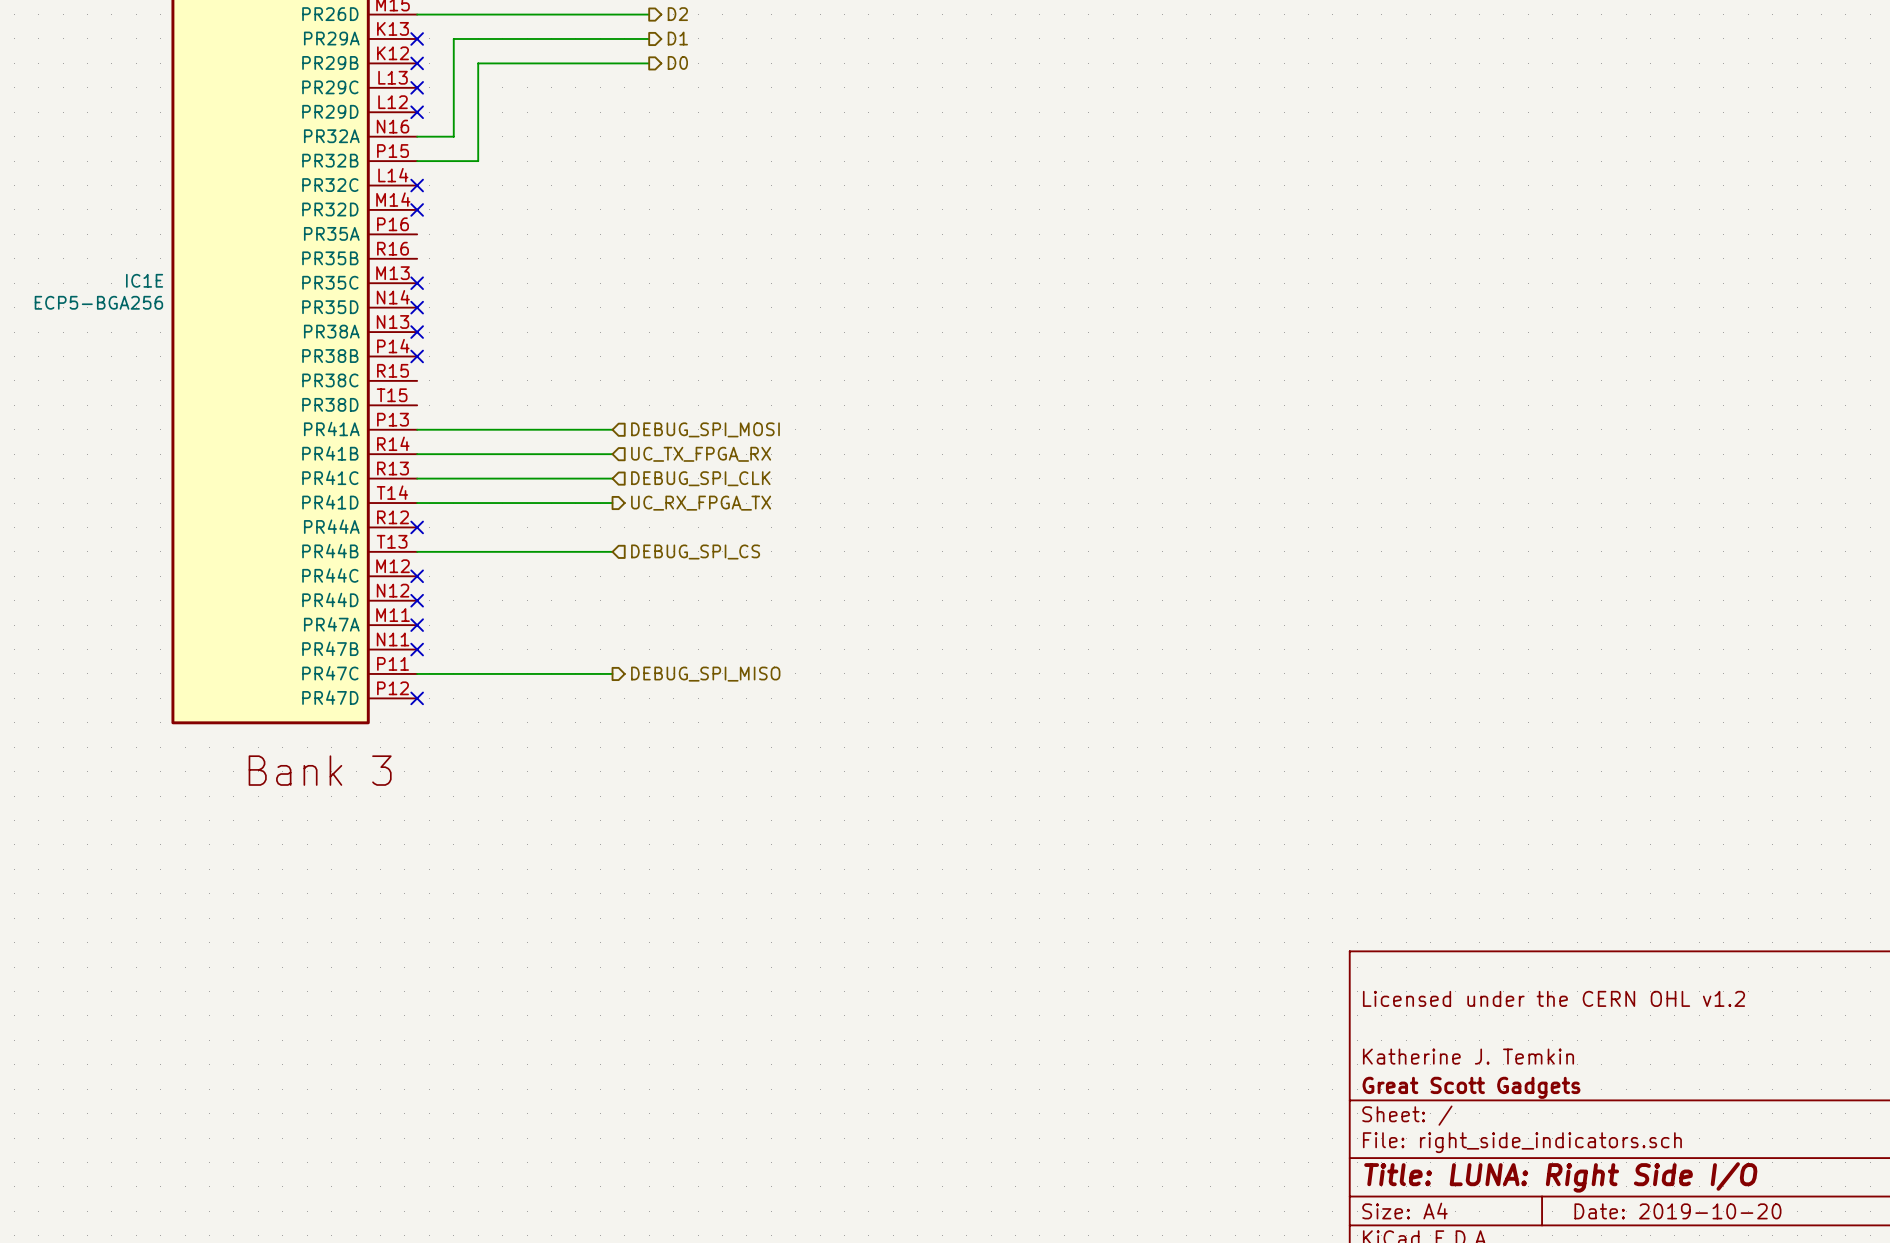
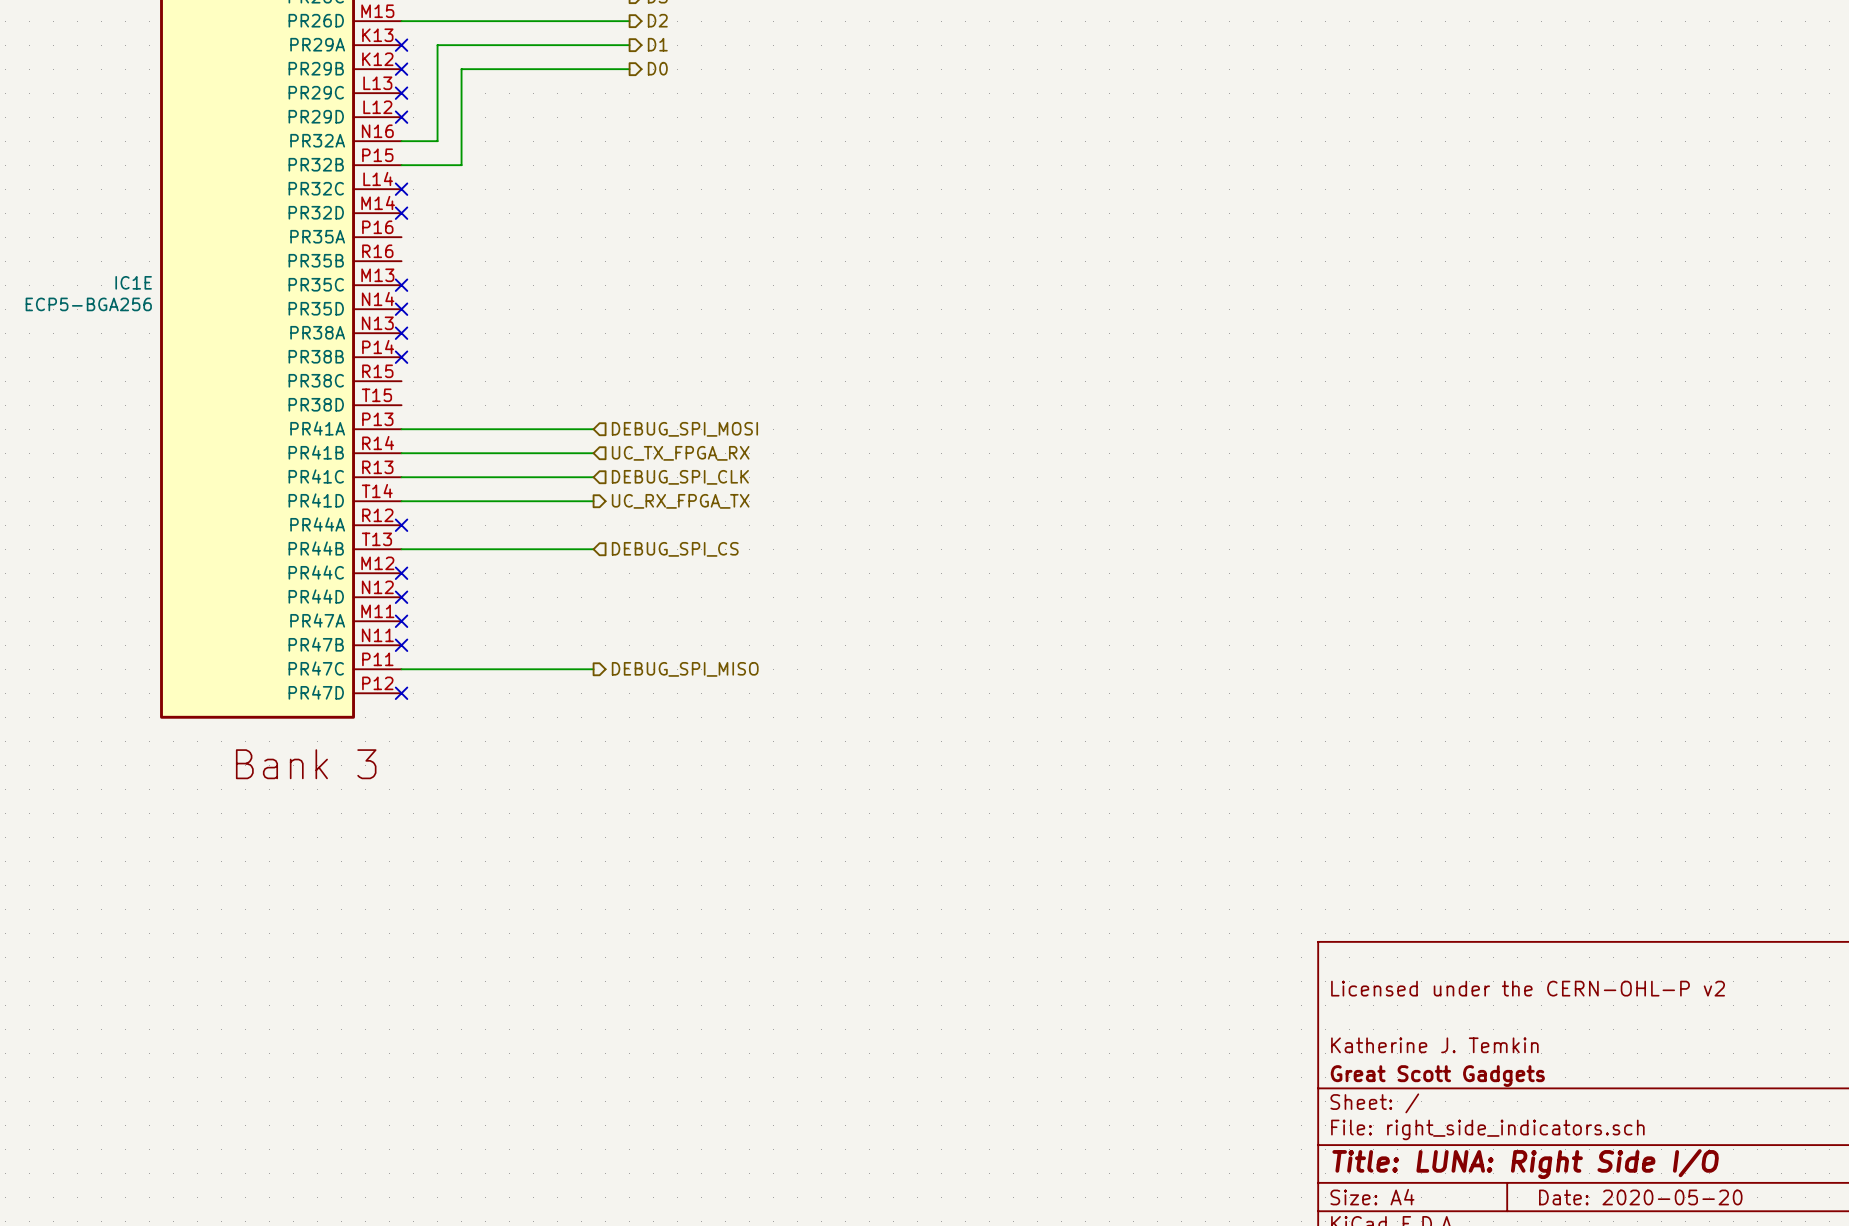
title block: Licensed under the CERN OHL v1.2 (1554, 998) -> Licensed under the CERN-OHL-P v2 (1528, 988)
title block: Date: 2019-10-20 (1677, 1211) -> Date: 2020-05-20 (1640, 1197)

